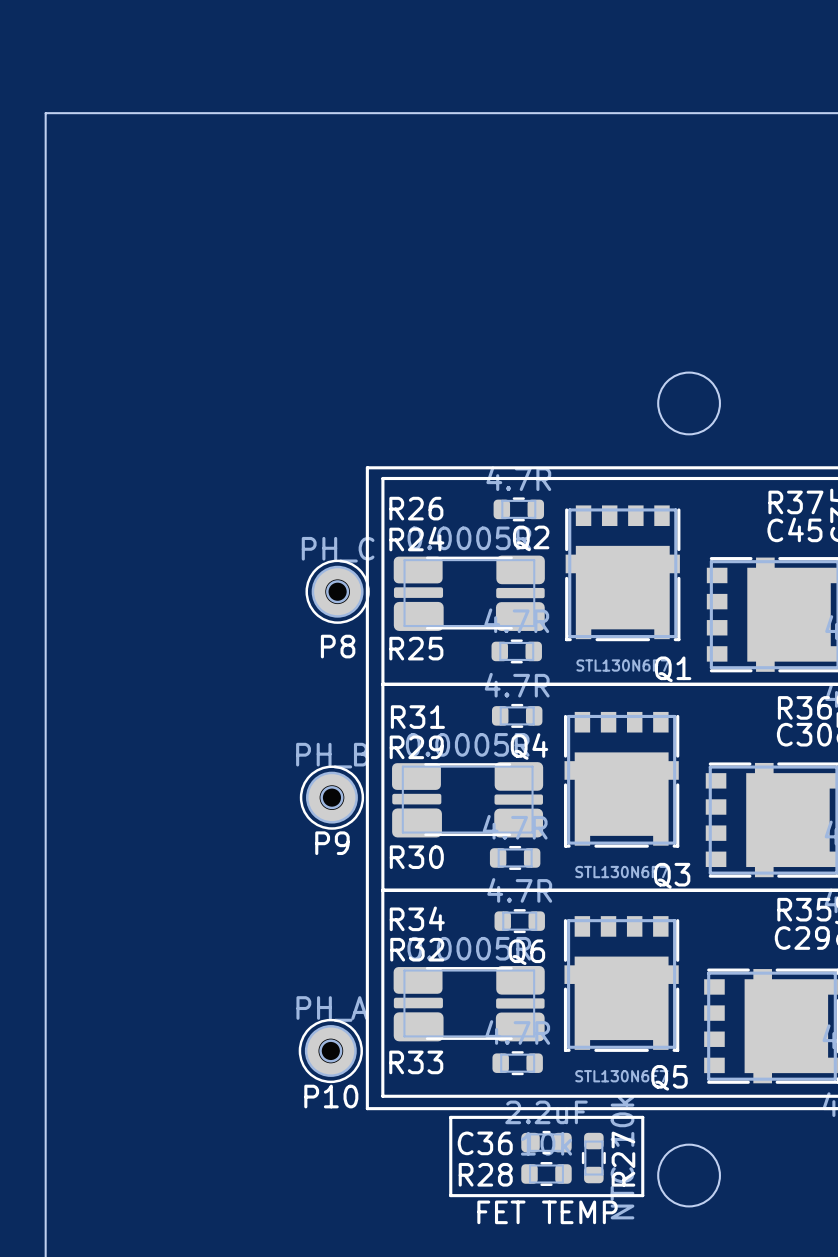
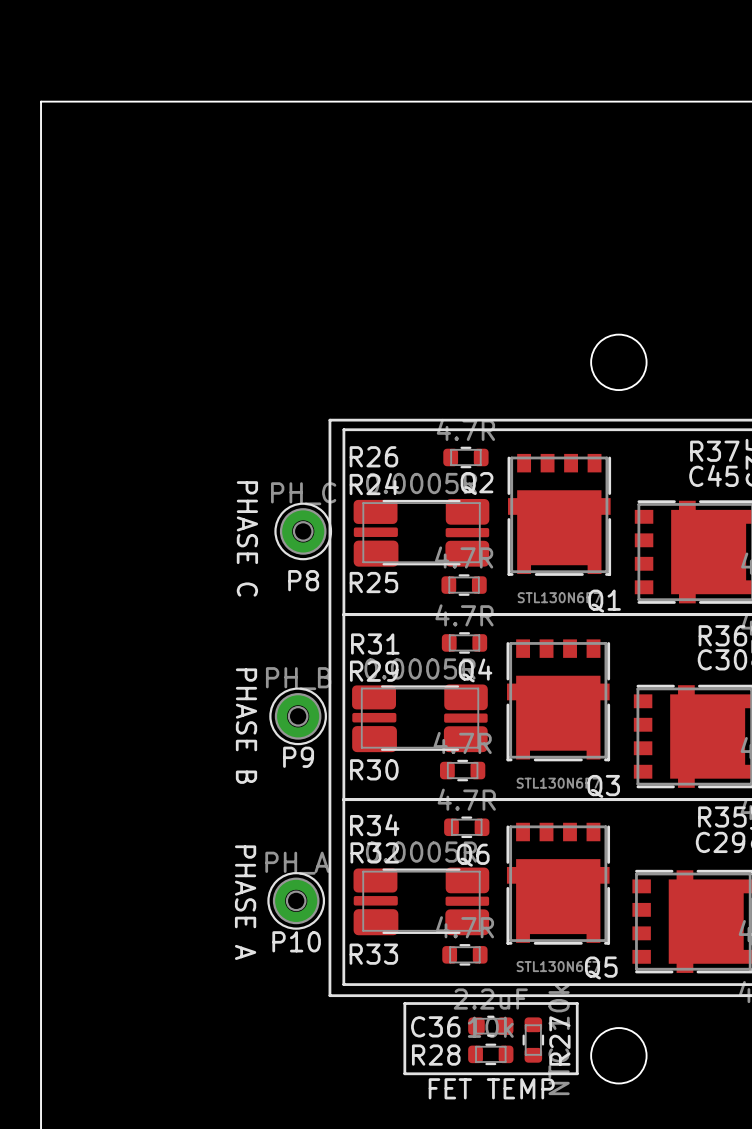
text: none -> PHASE C (247, 538)
text: none -> PHASE B (246, 726)
text: none -> PHASE A (245, 902)
P10 position: (330, 1050) -> (296, 900)

